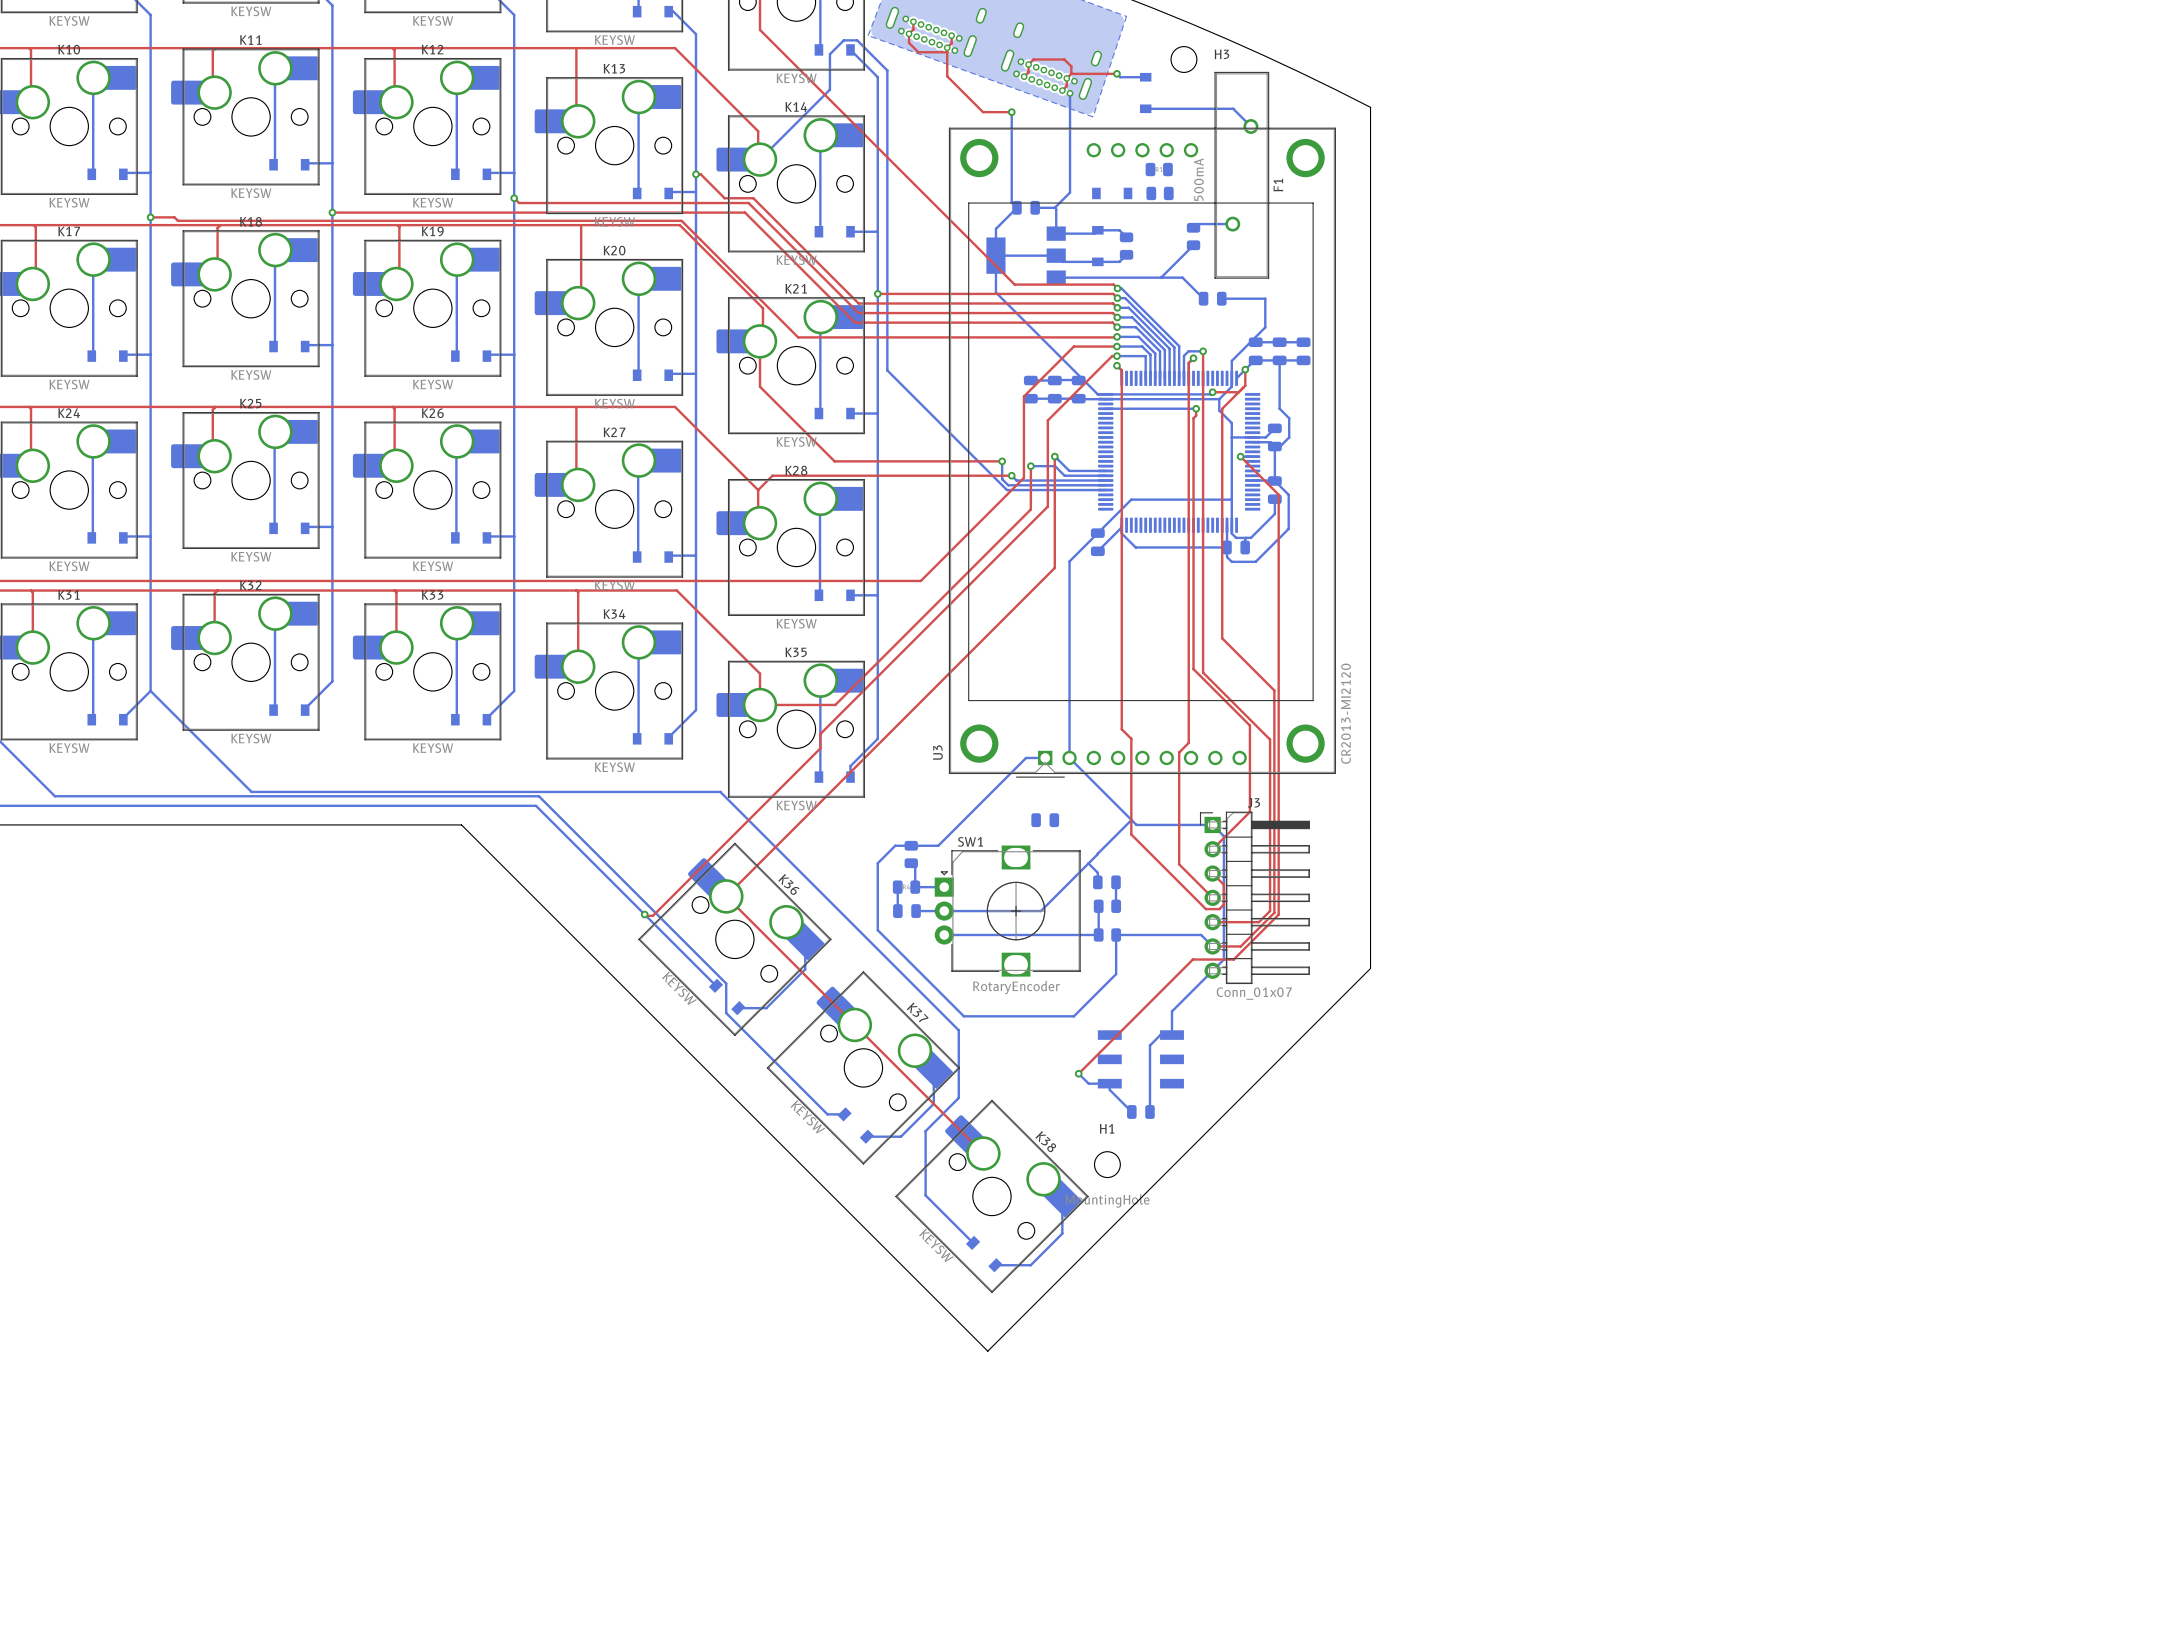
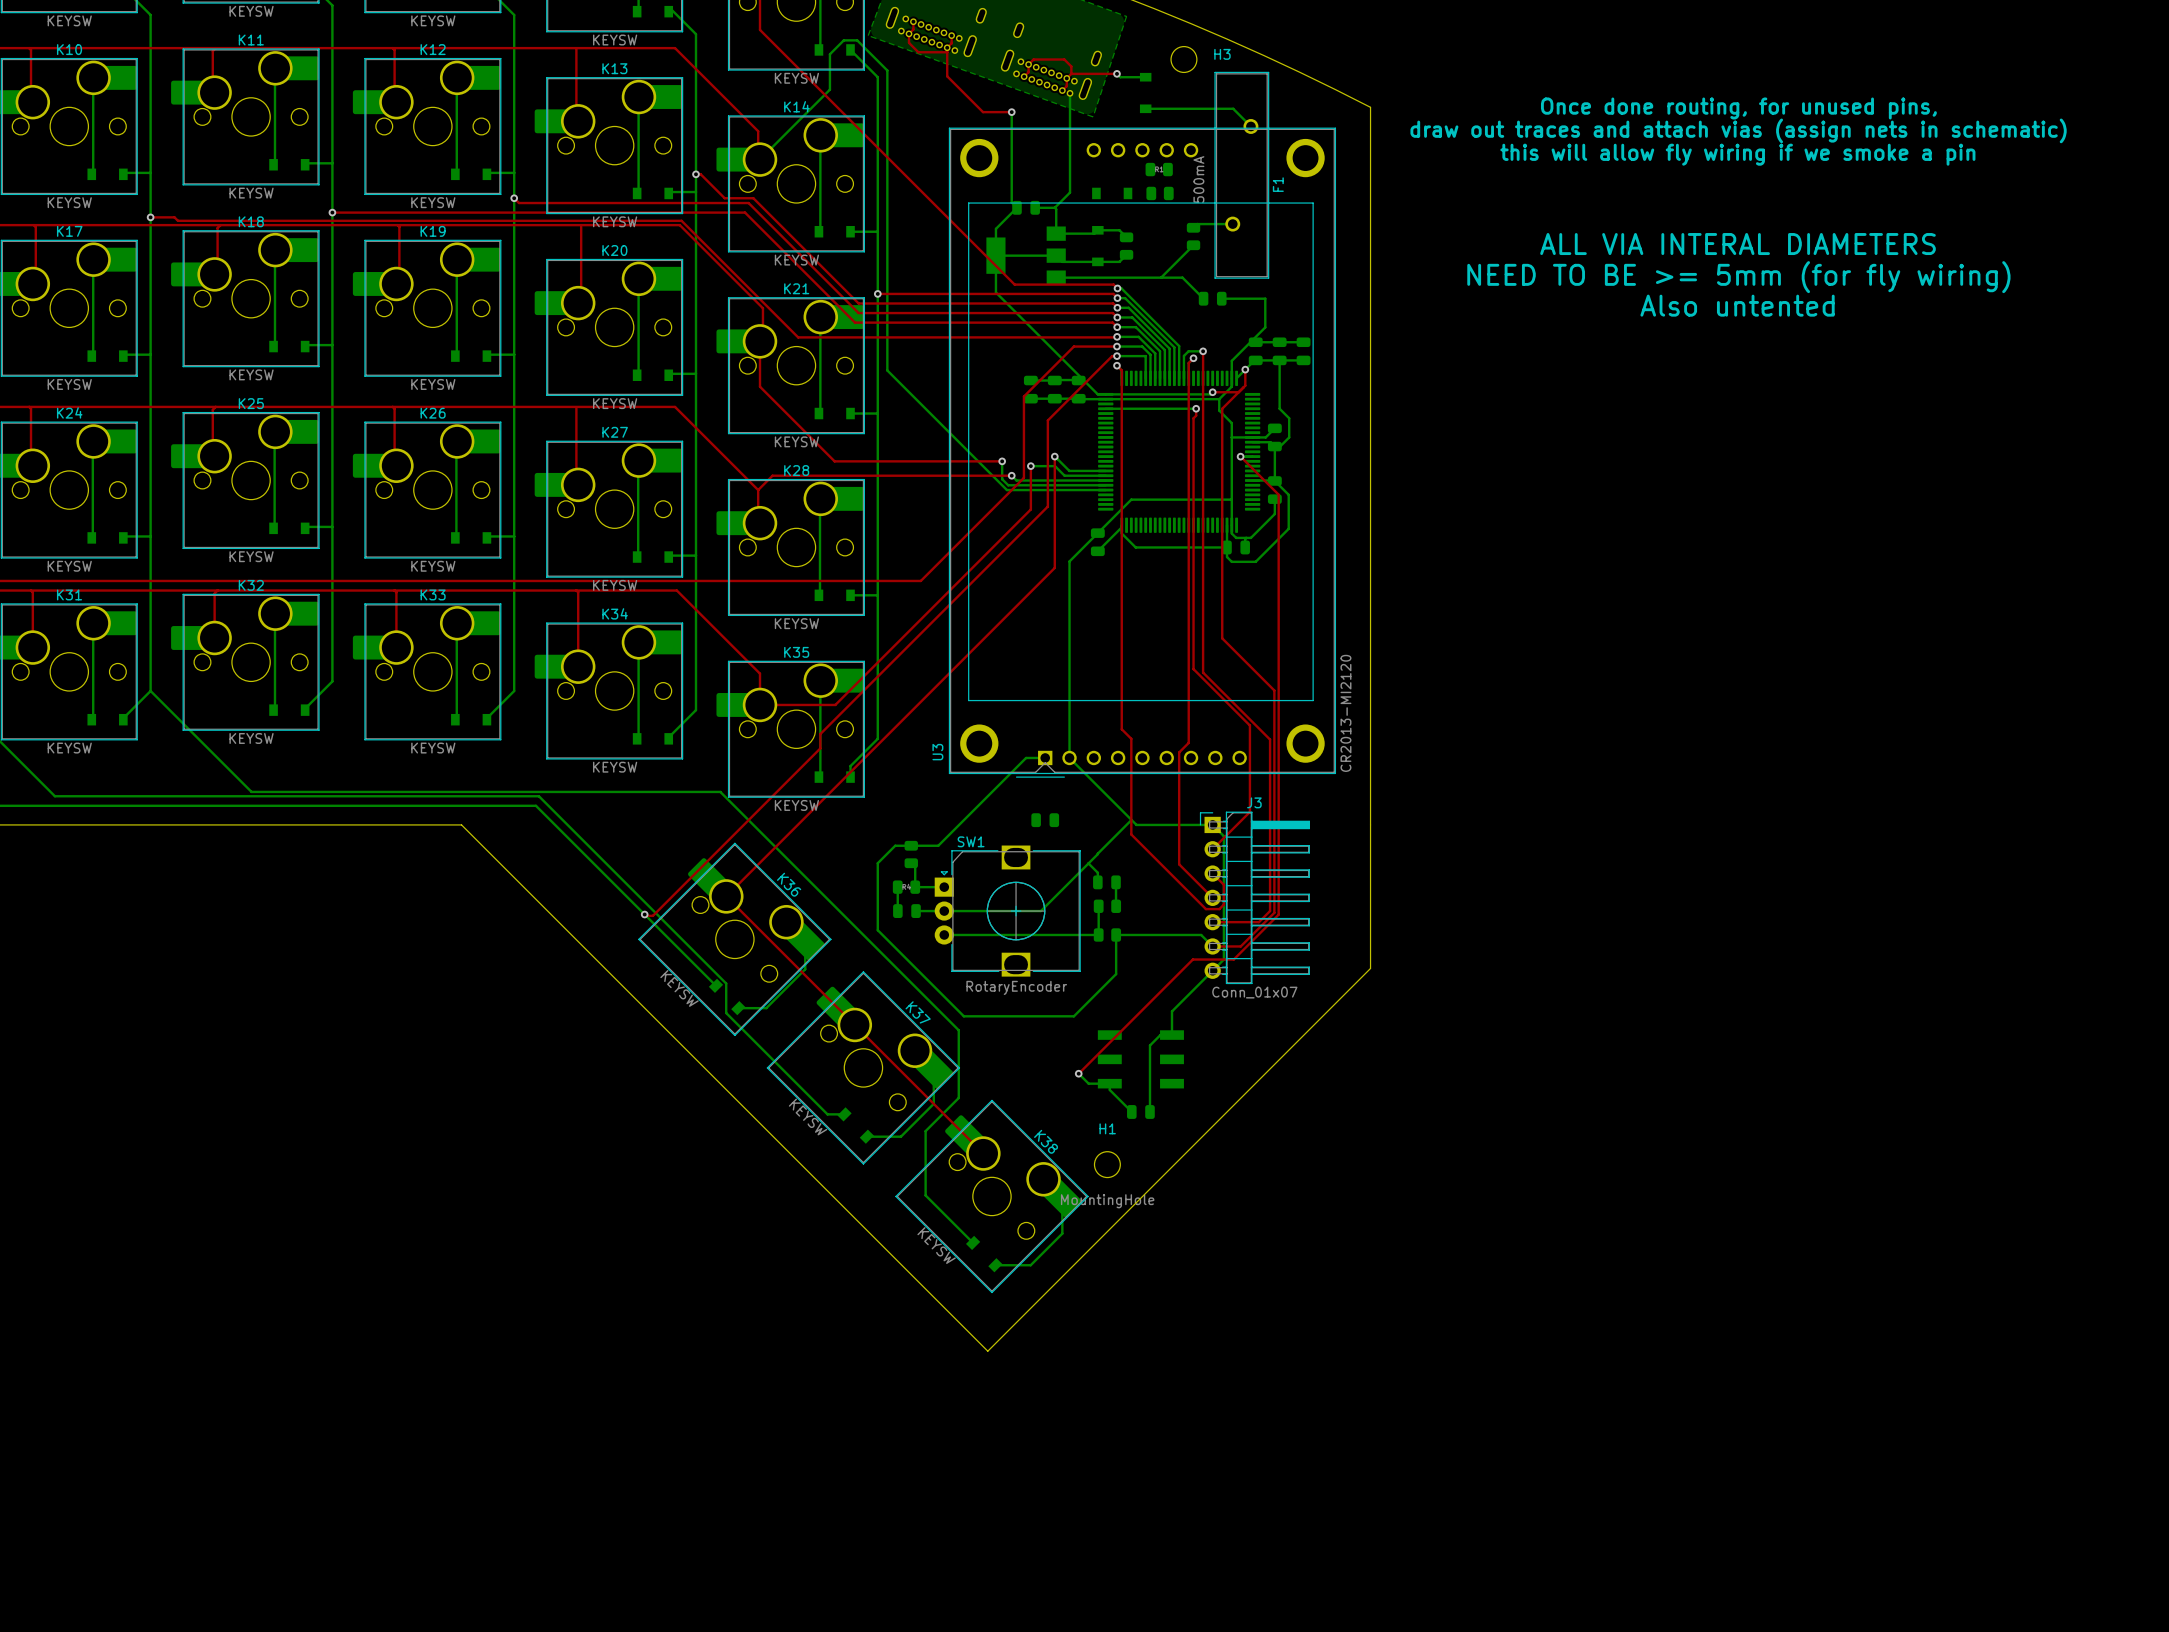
text: none -> Once done routing, for unused pins, (1738, 108)
text: none -> draw out traces and attach vias (assign nets in schematic) (1738, 130)
text: none -> this will allow fly wiring if we smoke a pin (1737, 154)
text: none -> ALL VIA INTERAL DIAMETERS (1737, 244)
text: none -> NEED TO BE >= 5mm (for fly wiring) (1738, 277)
text: none -> Also untented (1737, 305)

